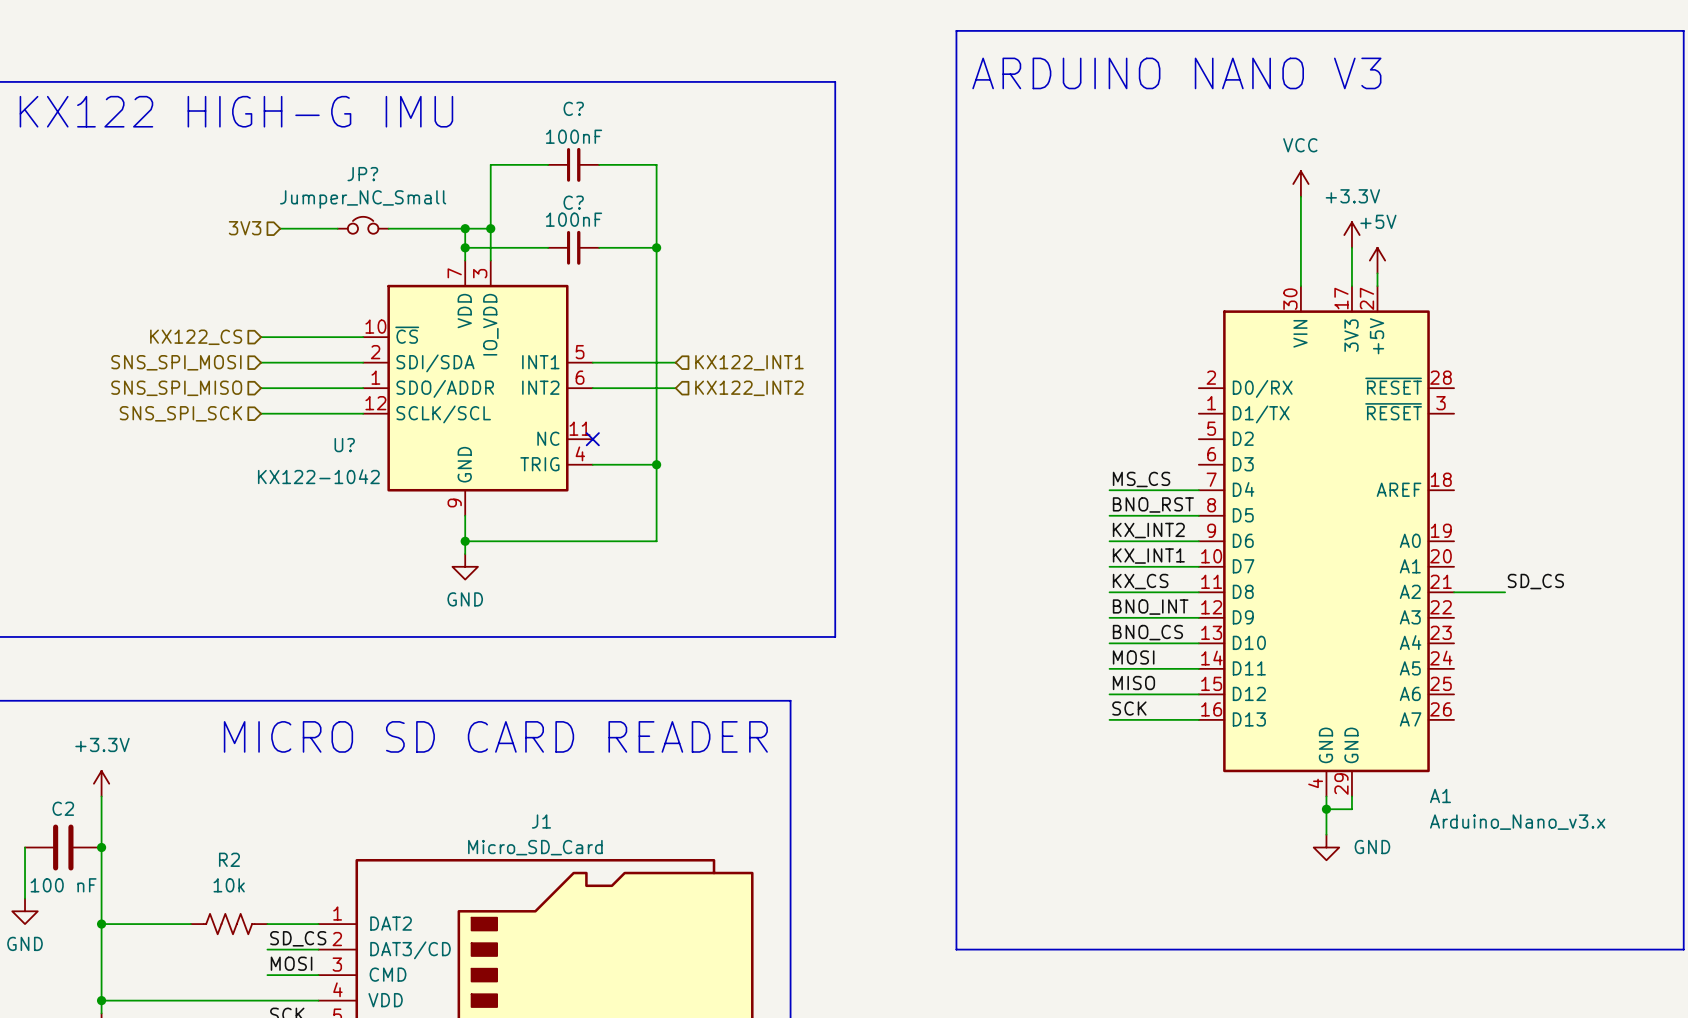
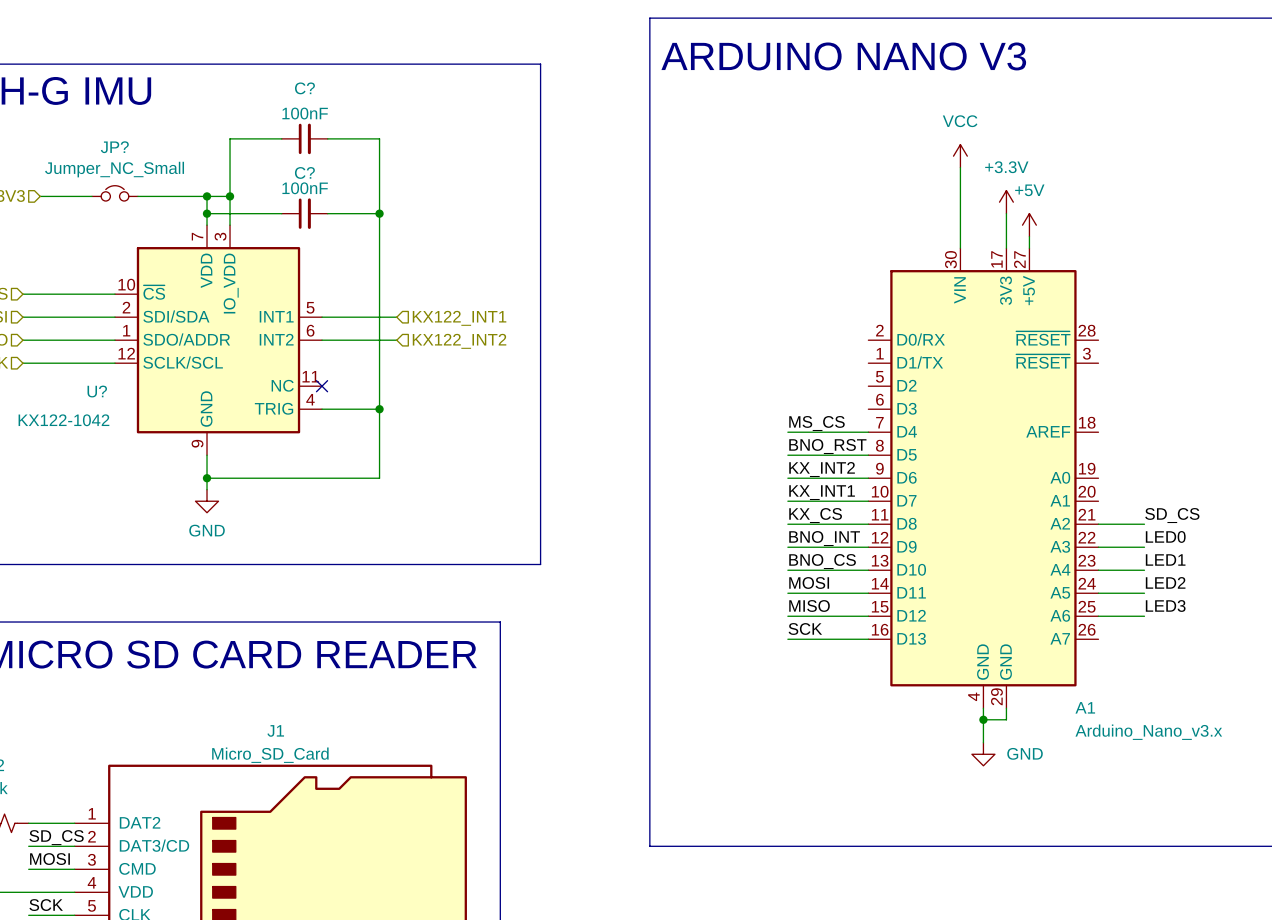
label: none -> LED0 (1165, 536)
wire: none -> (1098, 547) (1144, 547)
label: none -> LED1 (1165, 559)
wire: none -> (1098, 570) (1144, 570)
label: none -> LED2 (1165, 582)
wire: none -> (1098, 593) (1144, 593)
label: none -> LED3 (1165, 605)
wire: none -> (1098, 616) (1144, 616)

